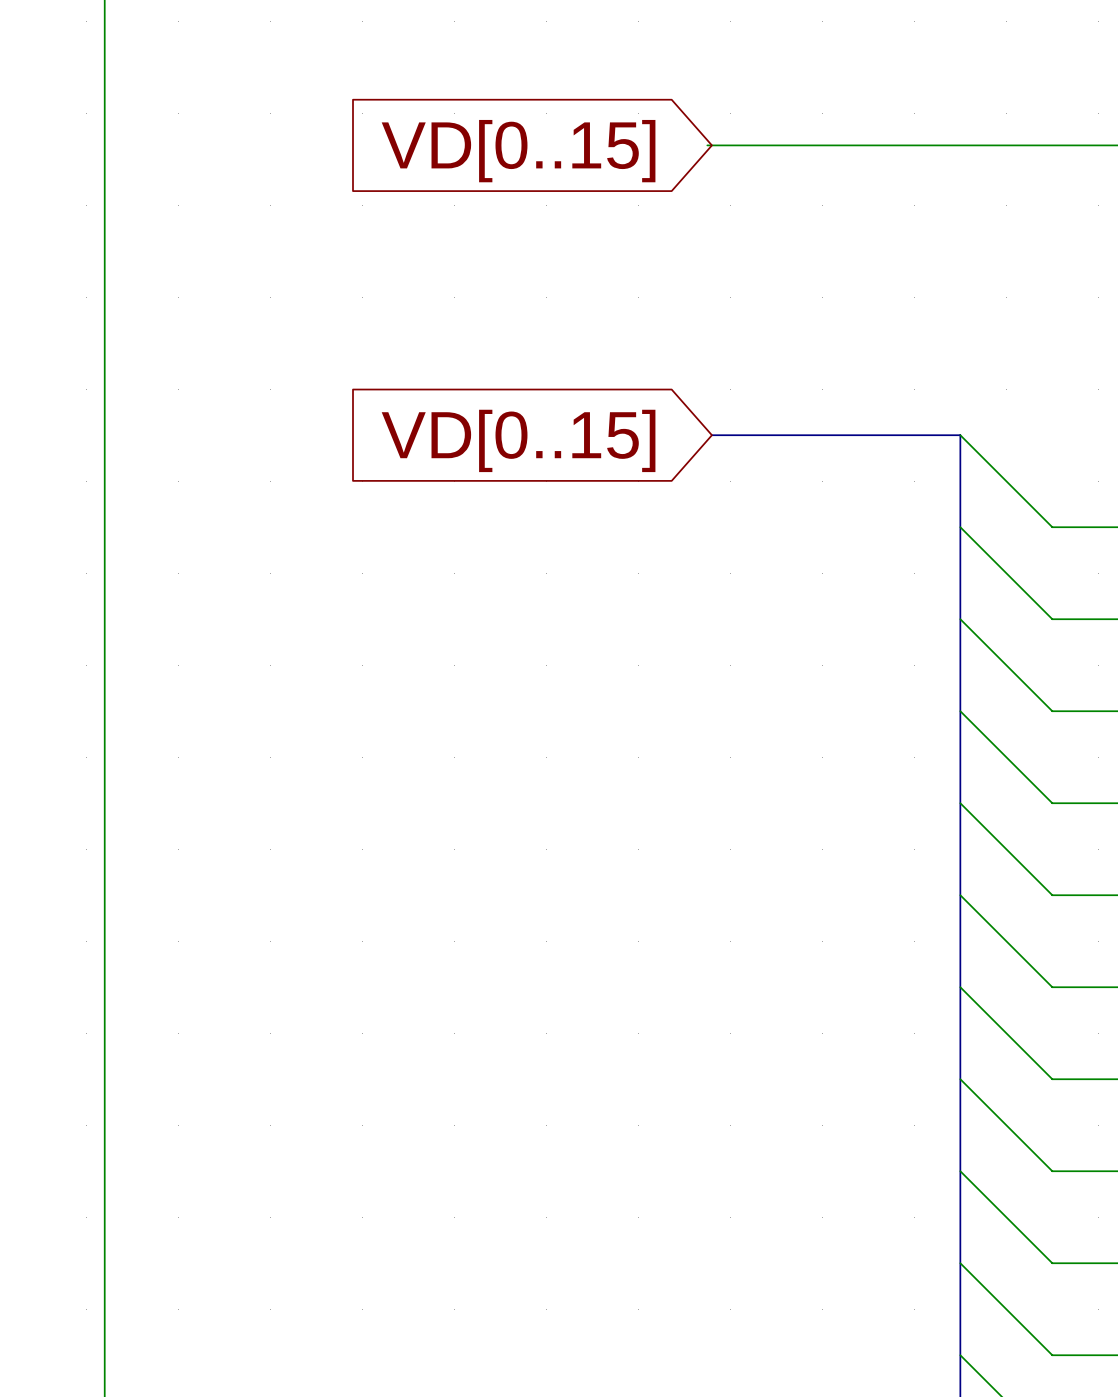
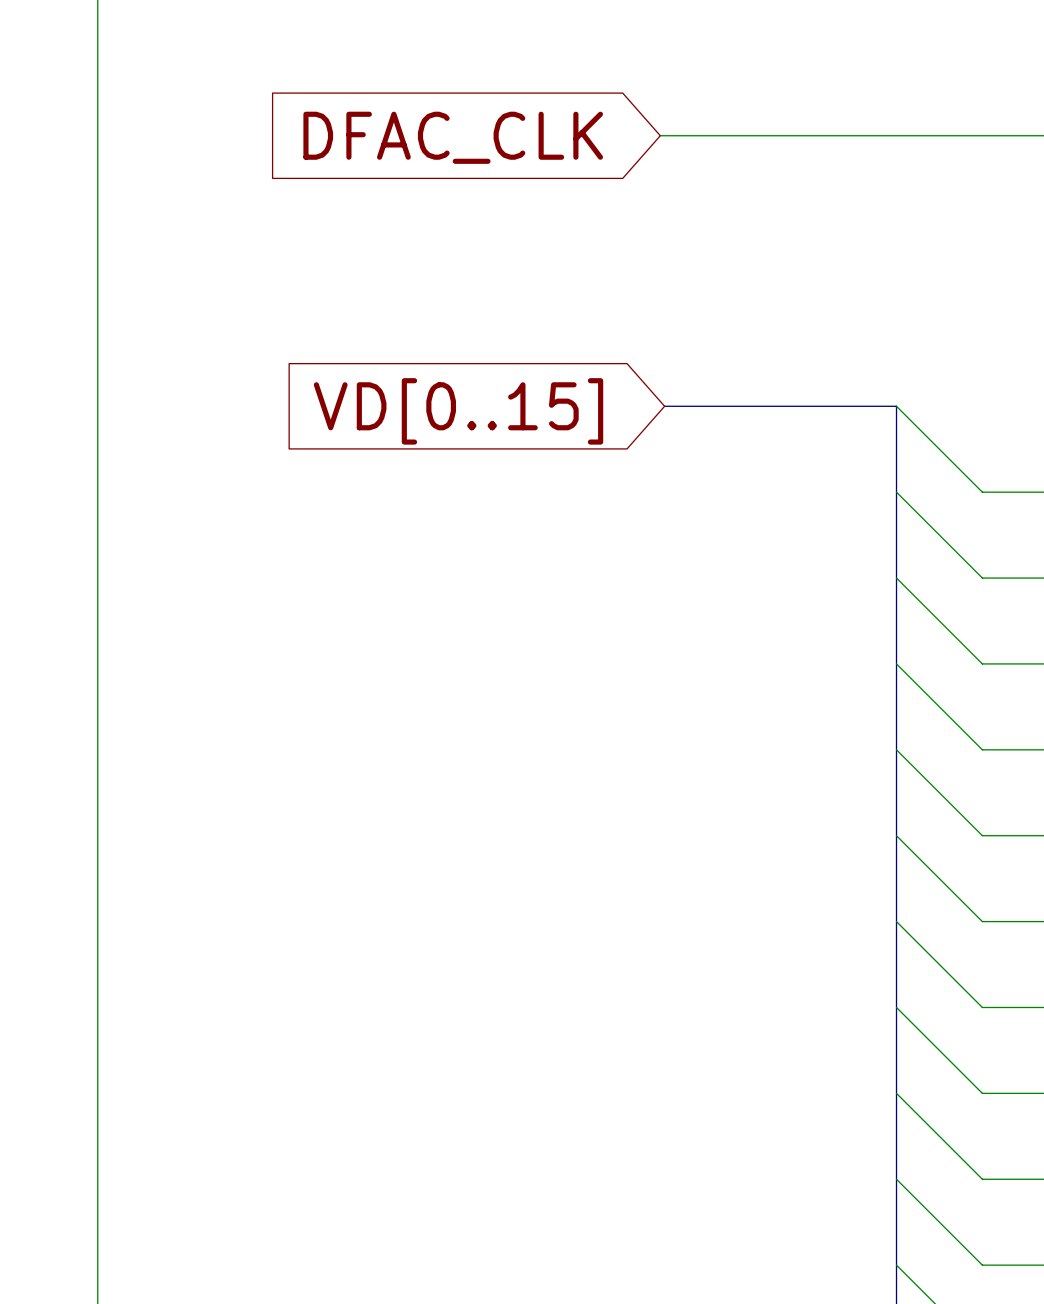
global label: VD[0..15] (518, 151) -> DFAC_CLK (453, 137)

